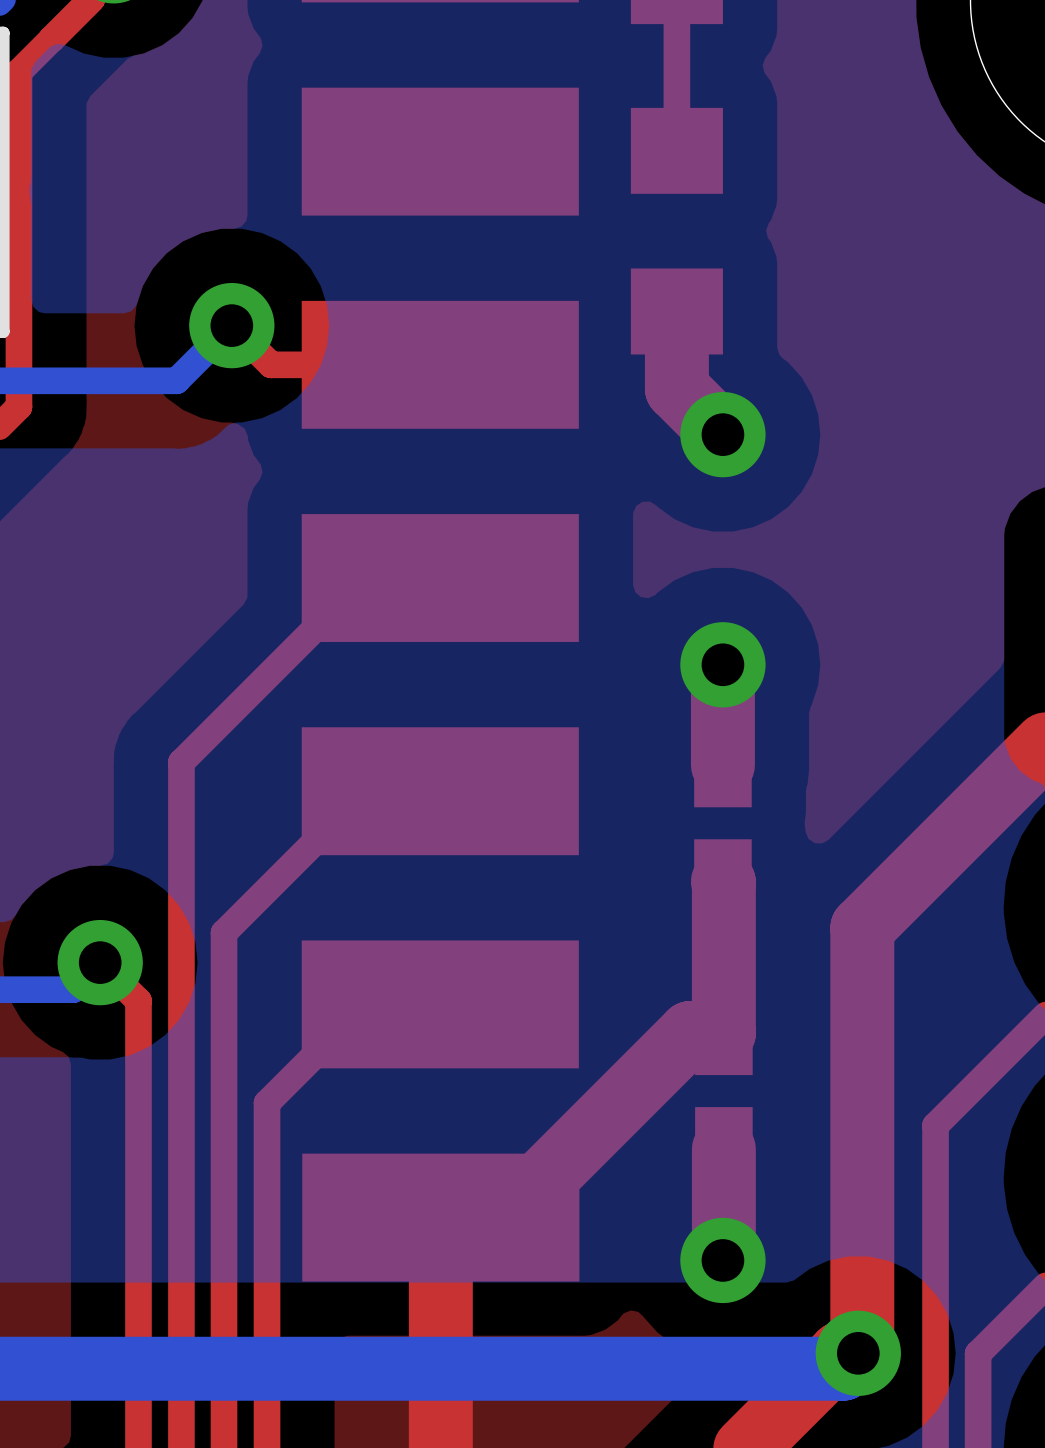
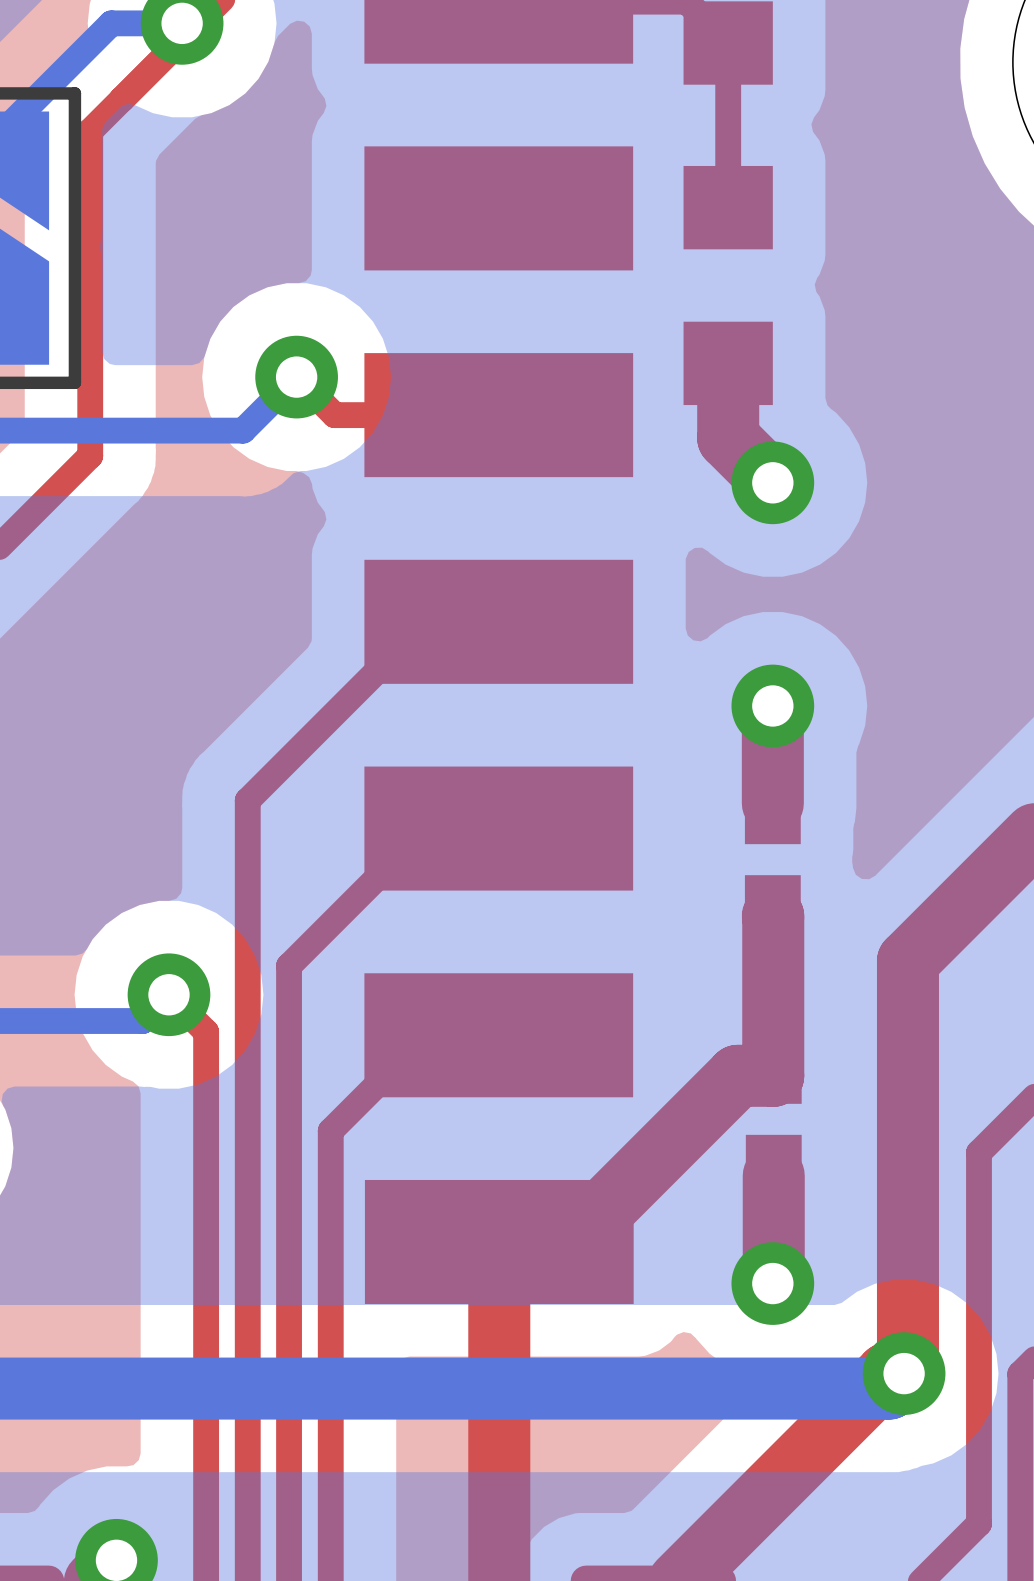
top track: (723, 882) (723, 1032) (690, 1032) (505, 1217) -> (773, 916) (773, 1075) (737, 1075) (571, 1242) (562, 1242)

